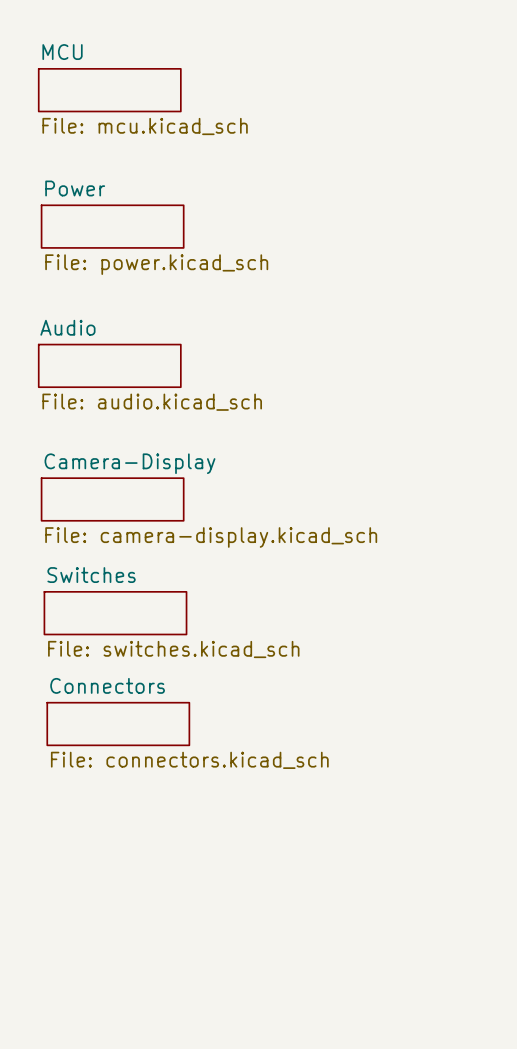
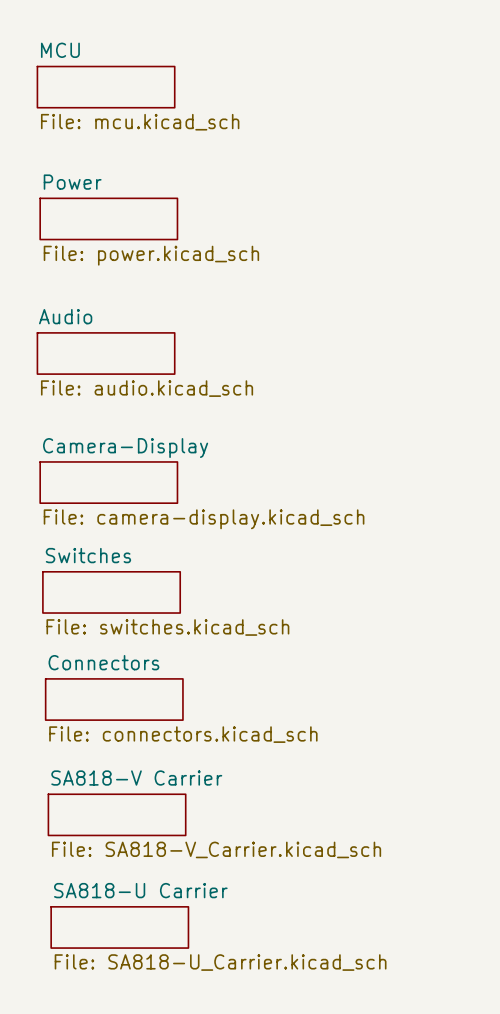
sheet SA818-V Carrier: none -> File: SA818-V_Carrier.kicad_sch (117, 814)
sheet SA818-U Carrier: none -> File: SA818-U_Carrier.kicad_sch (119, 927)

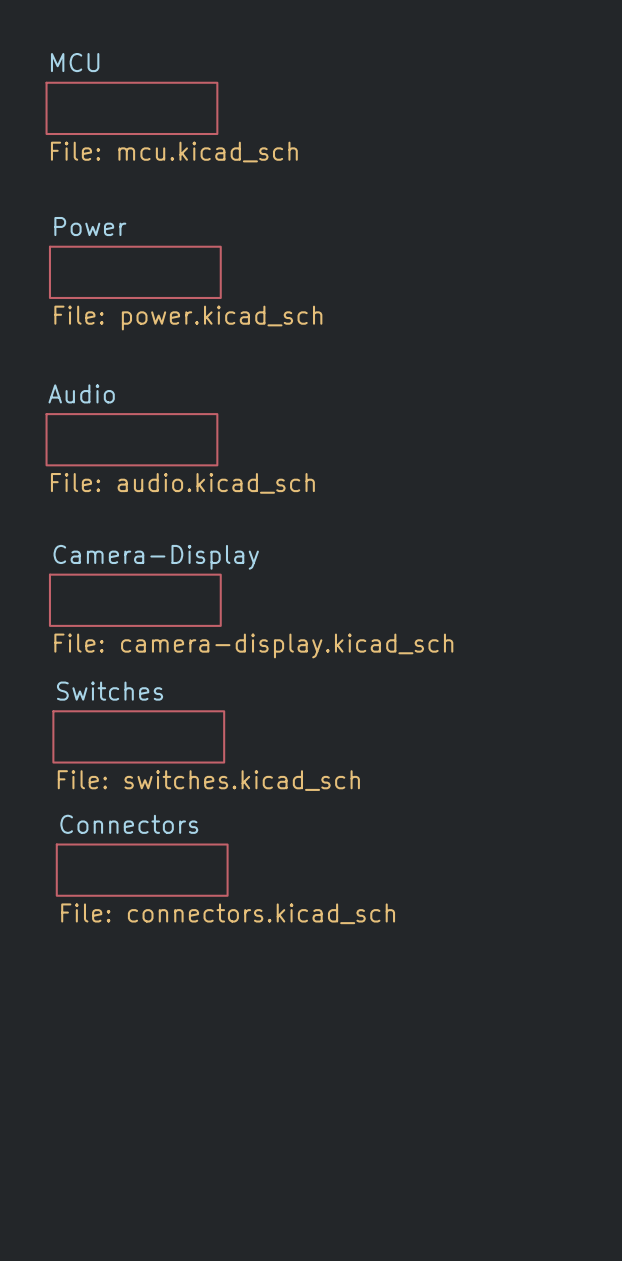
sheet SA818-V Carrier: File: SA818-V_Carrier.kicad_sch (117, 814) -> none
sheet SA818-U Carrier: File: SA818-U_Carrier.kicad_sch (119, 927) -> none

